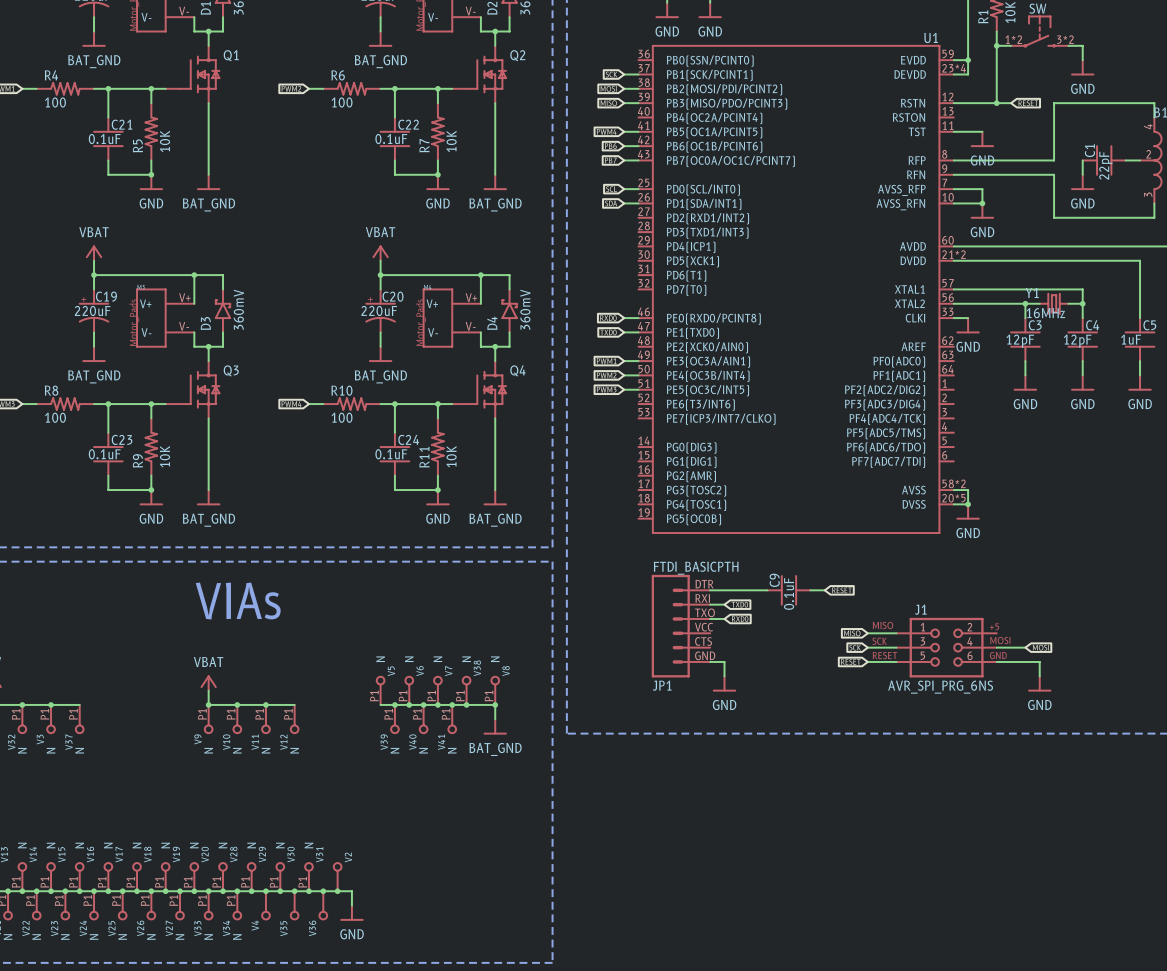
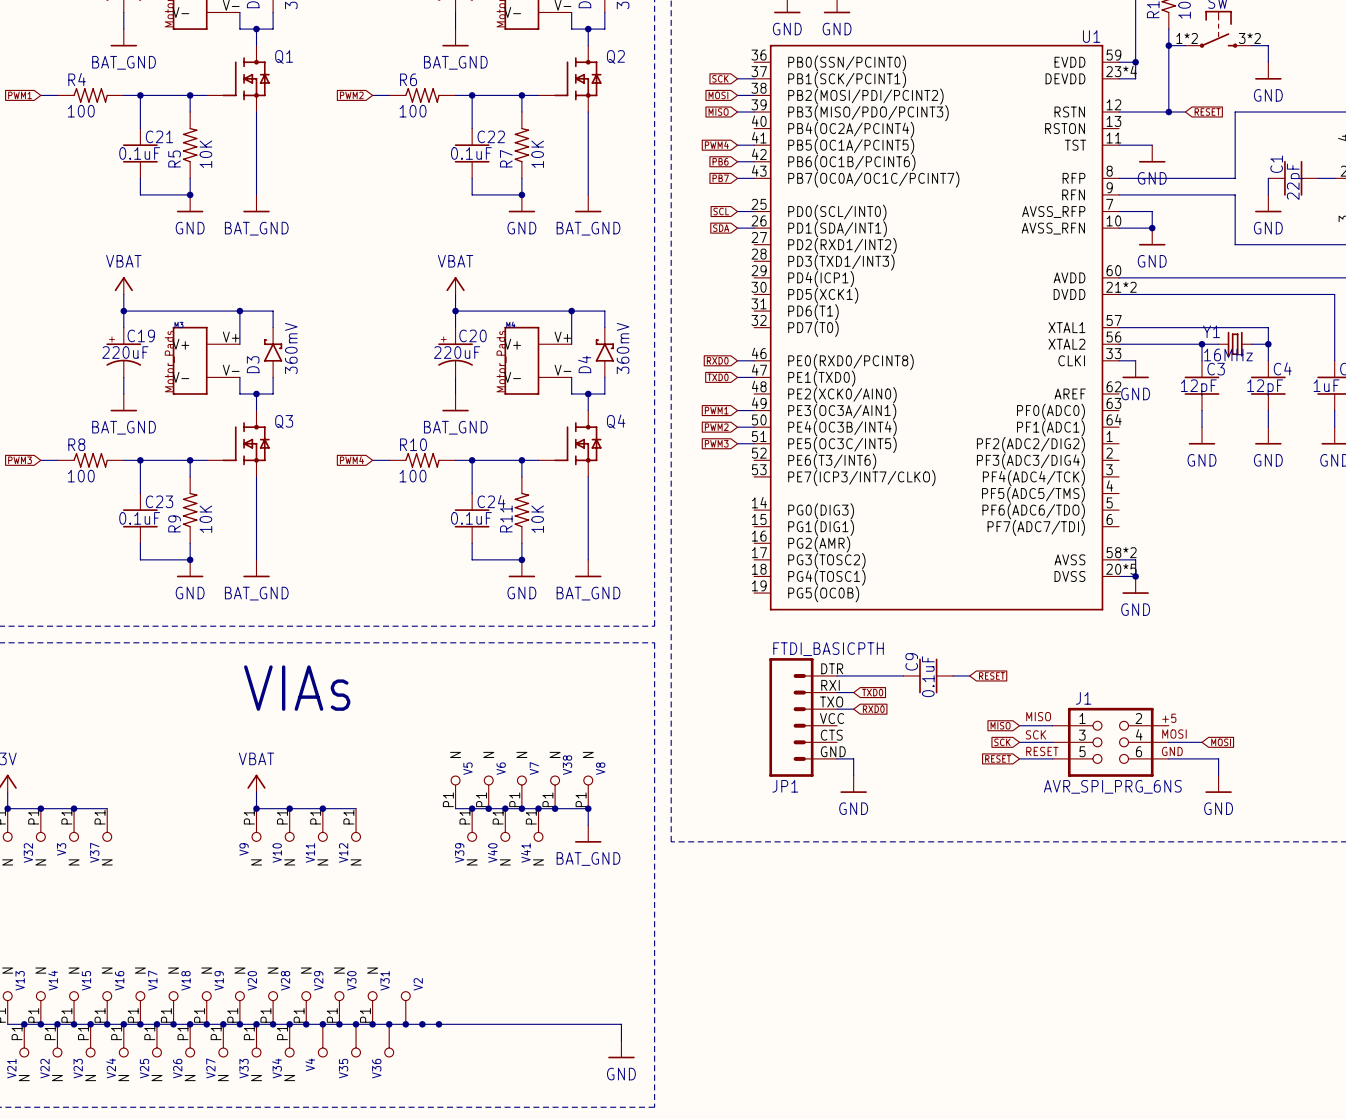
wire: (351, 891) (351, 905) -> (422, 1024) (621, 1024) (621, 1040)
junction: none -> (422, 1024)
junction: none -> (438, 1024)
power symbol: GND (351, 913) -> none
power symbol: none -> GND (621, 1049)

